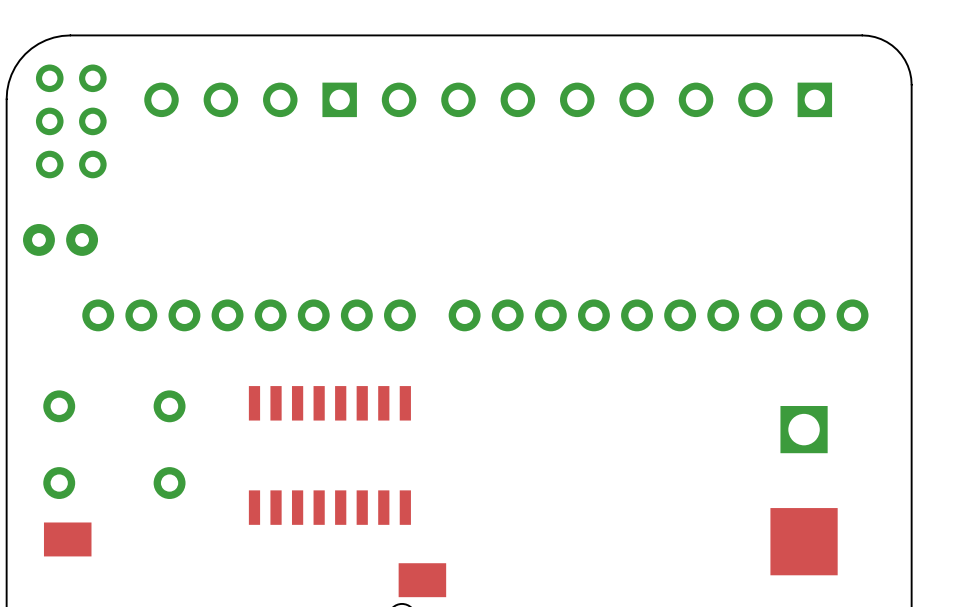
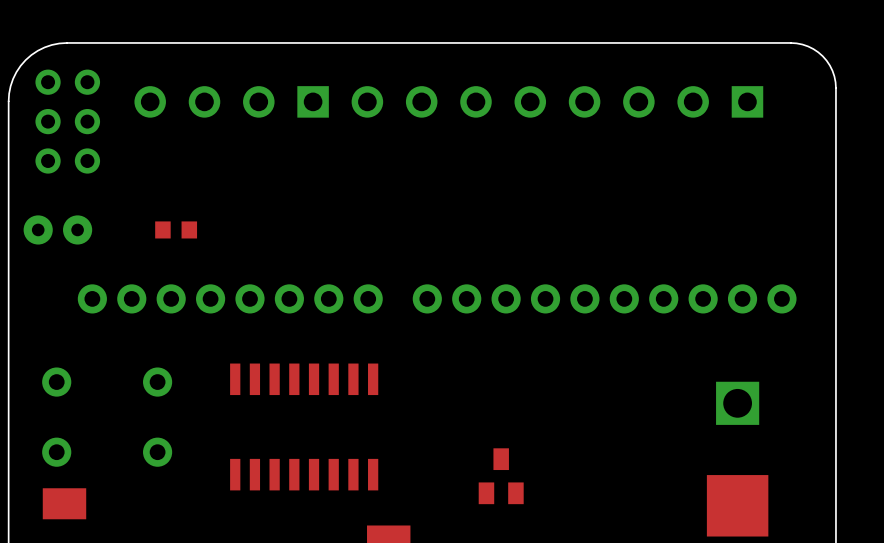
part: none -> (176, 229)
part: none -> (501, 476)

